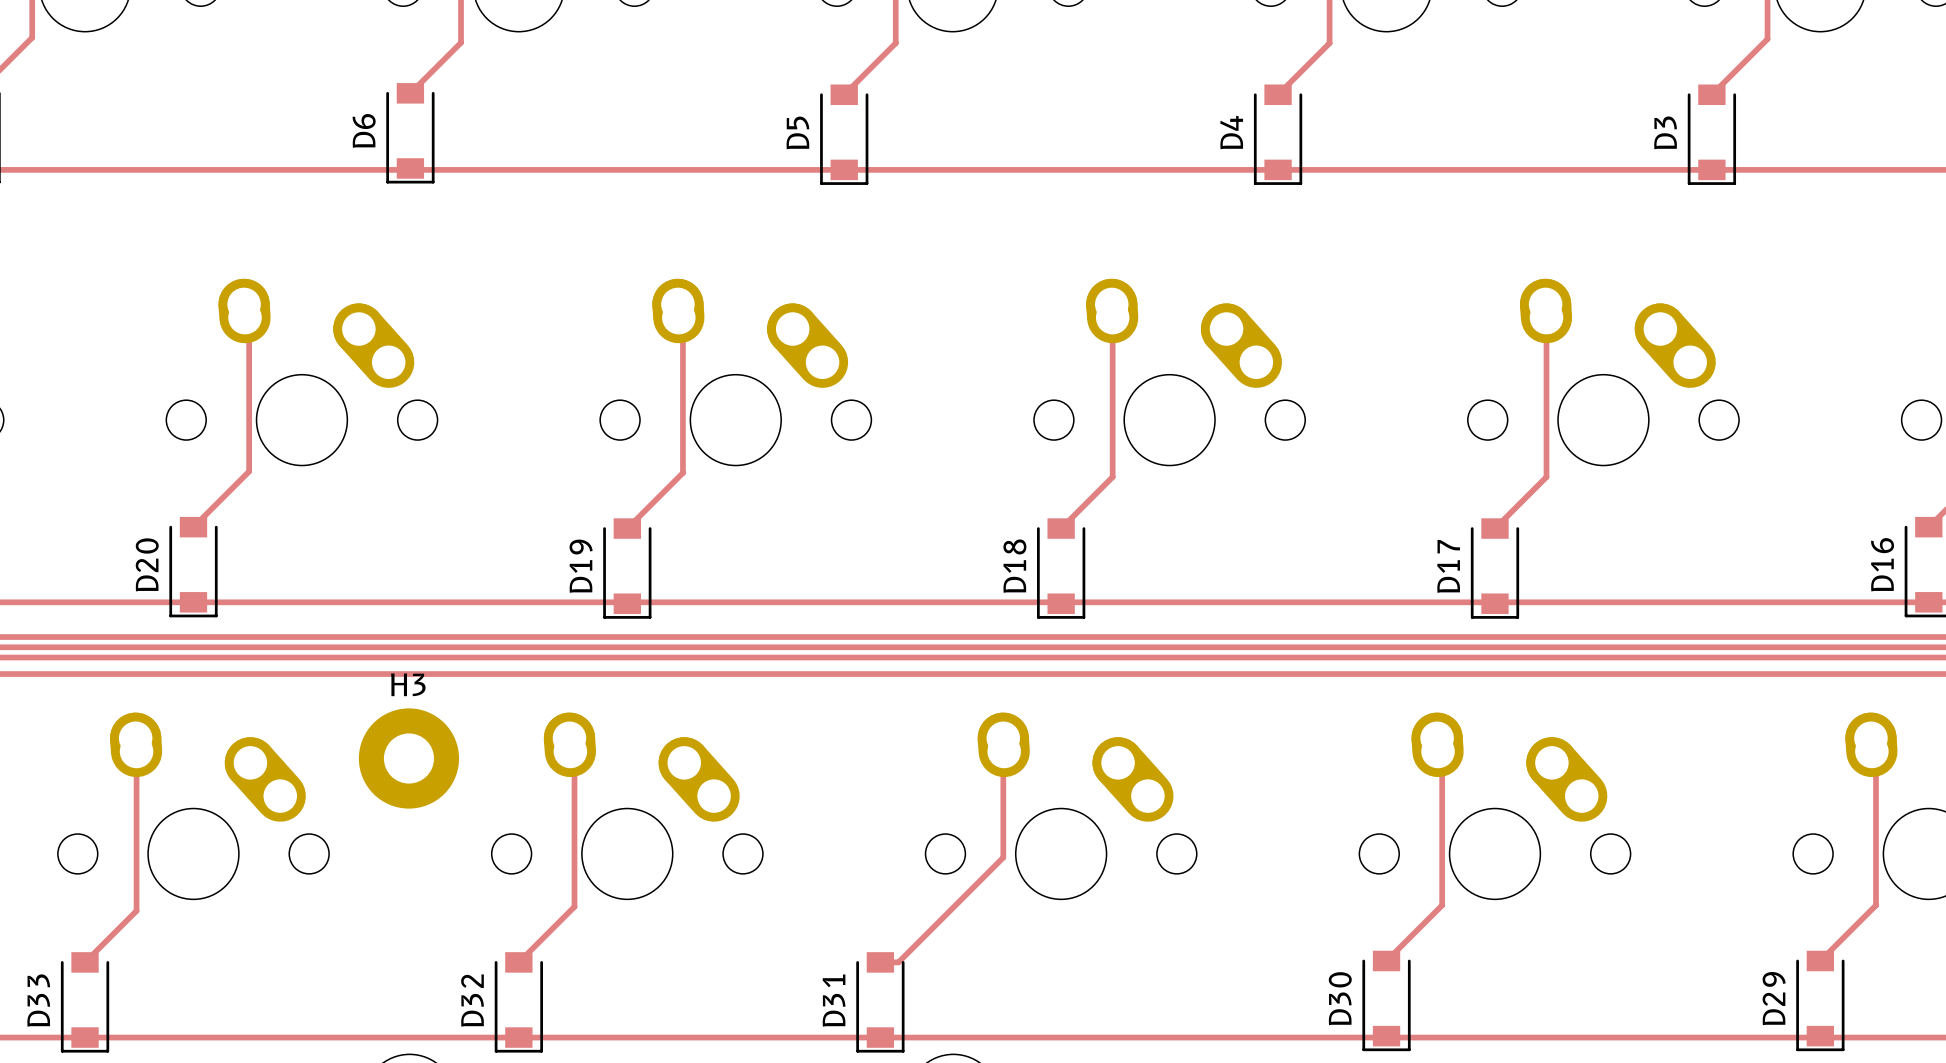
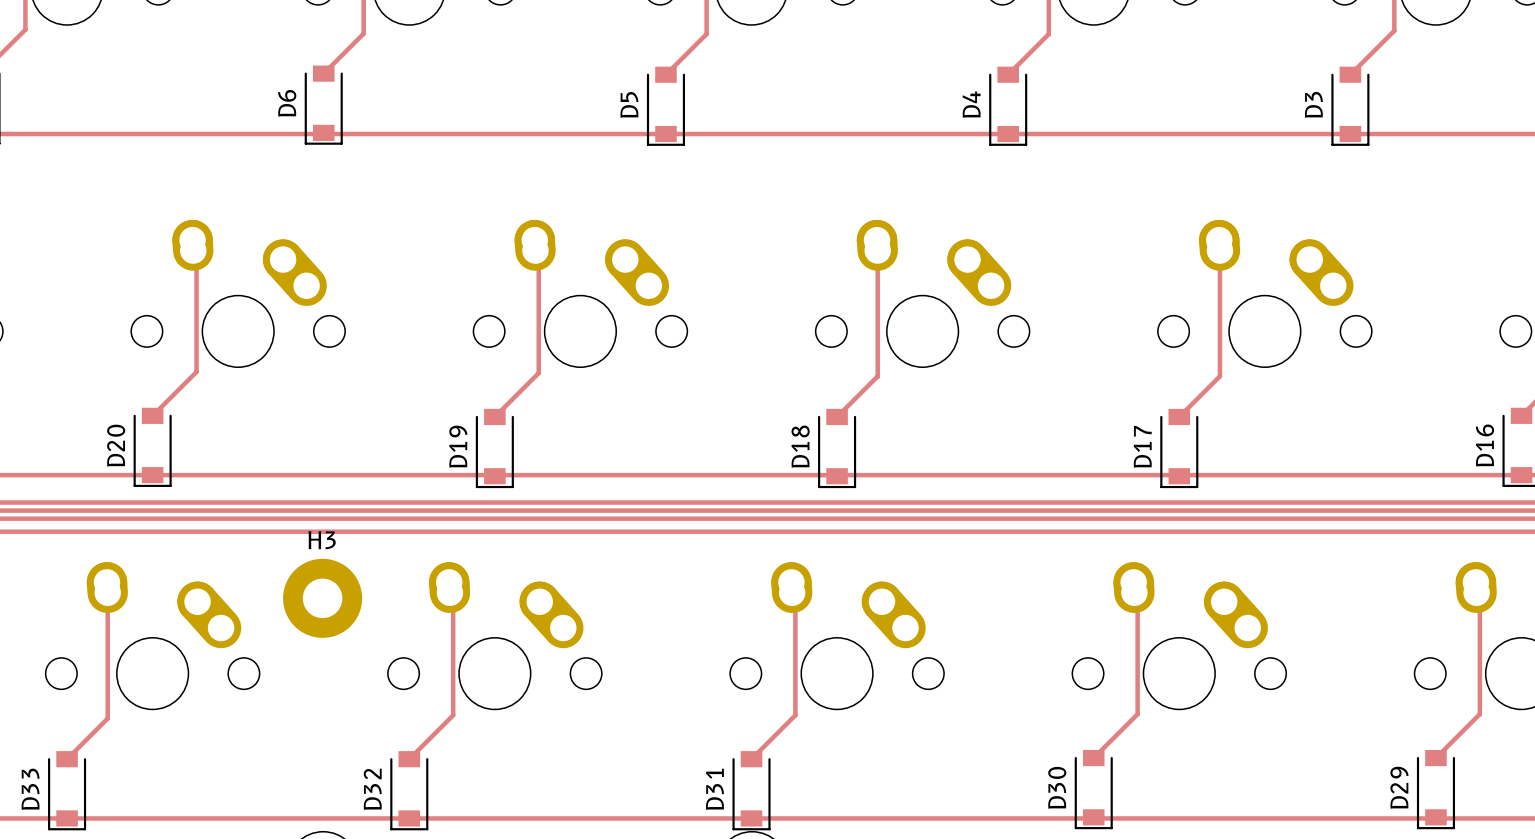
track: (1003, 738) (1003, 857) (898, 962) (880, 962) -> none
track: none -> (795, 586) (795, 715) (751, 759)
D31 position: (880, 1002) -> (751, 790)

